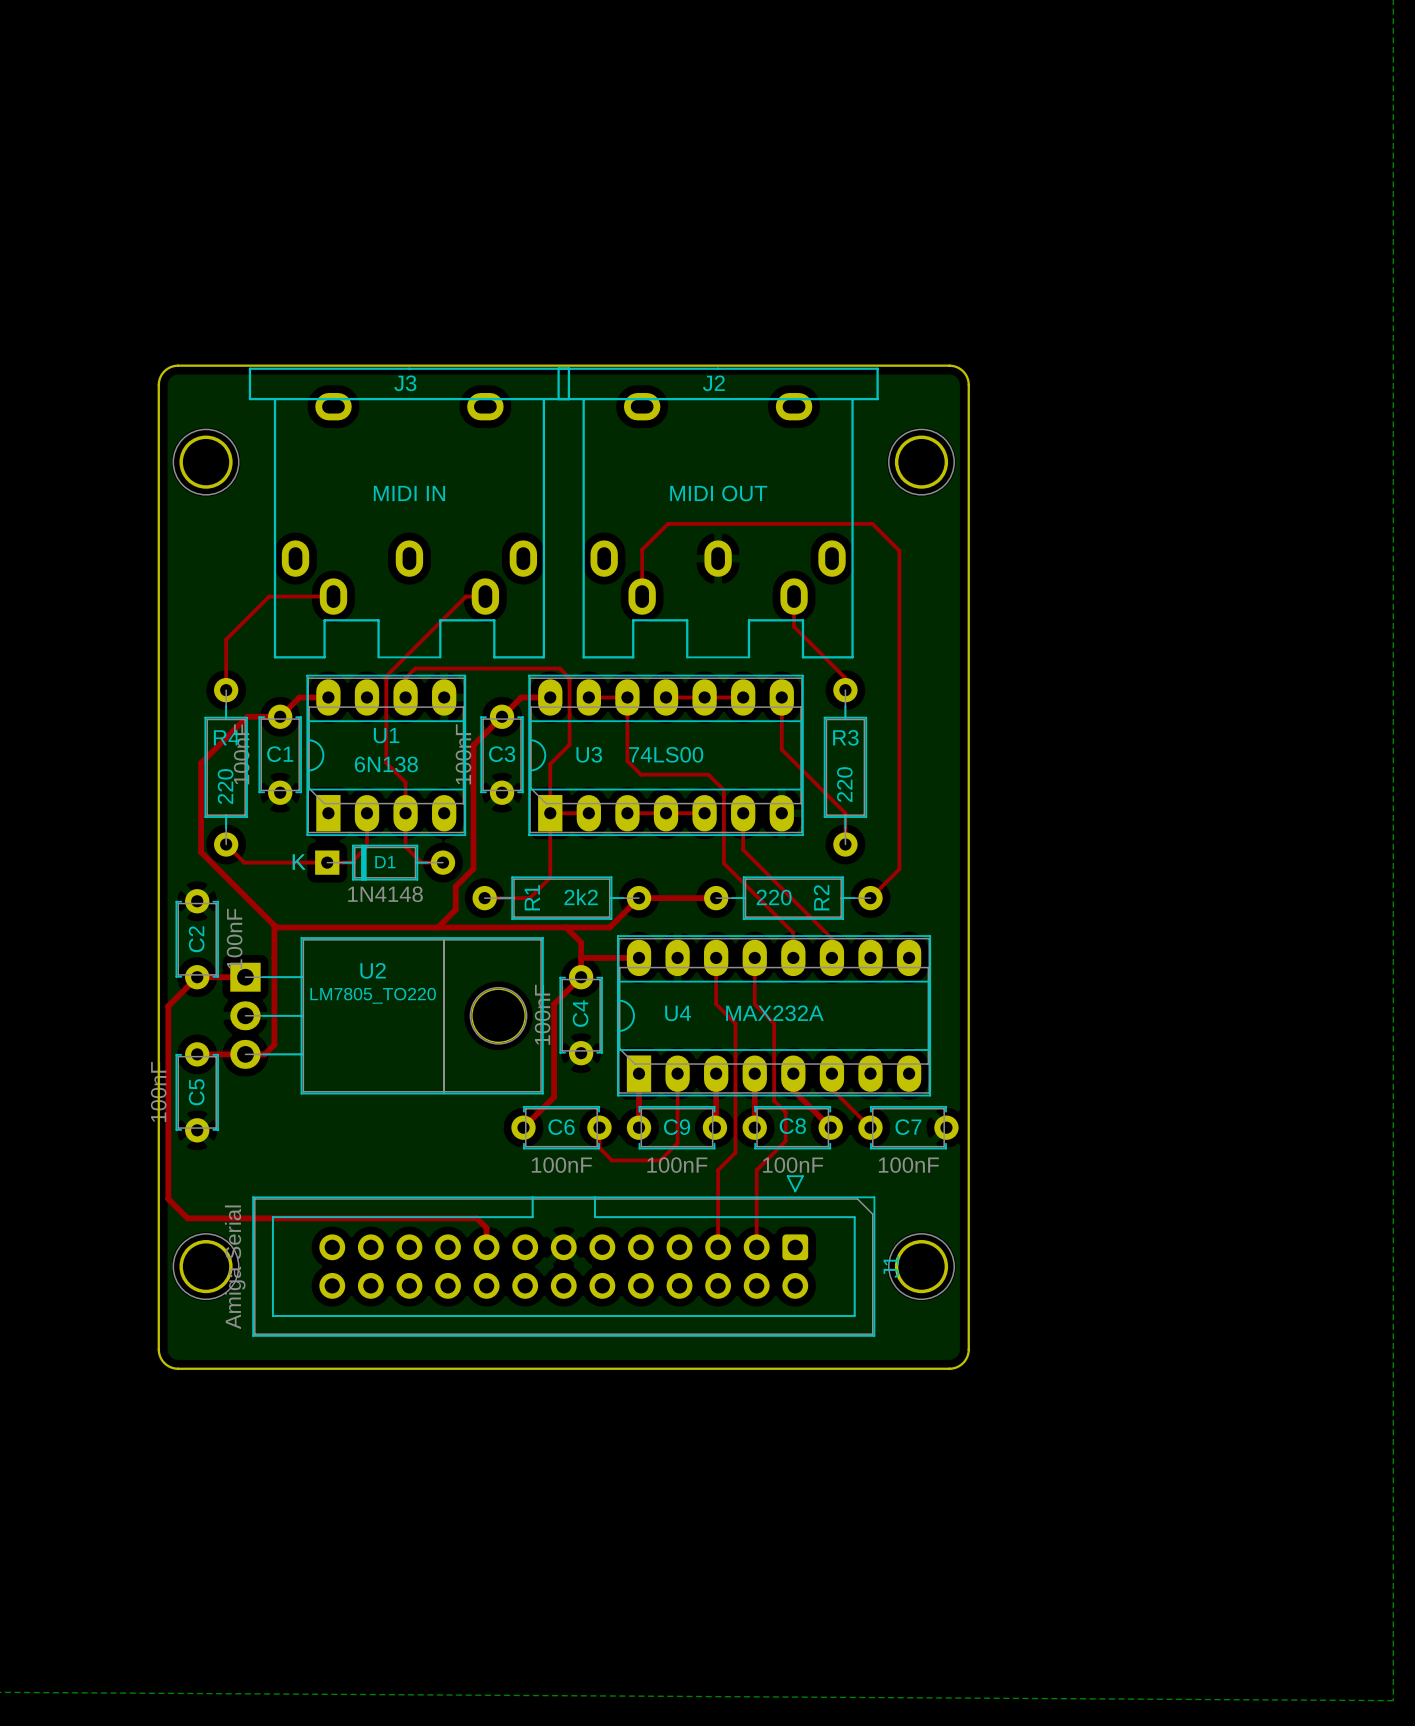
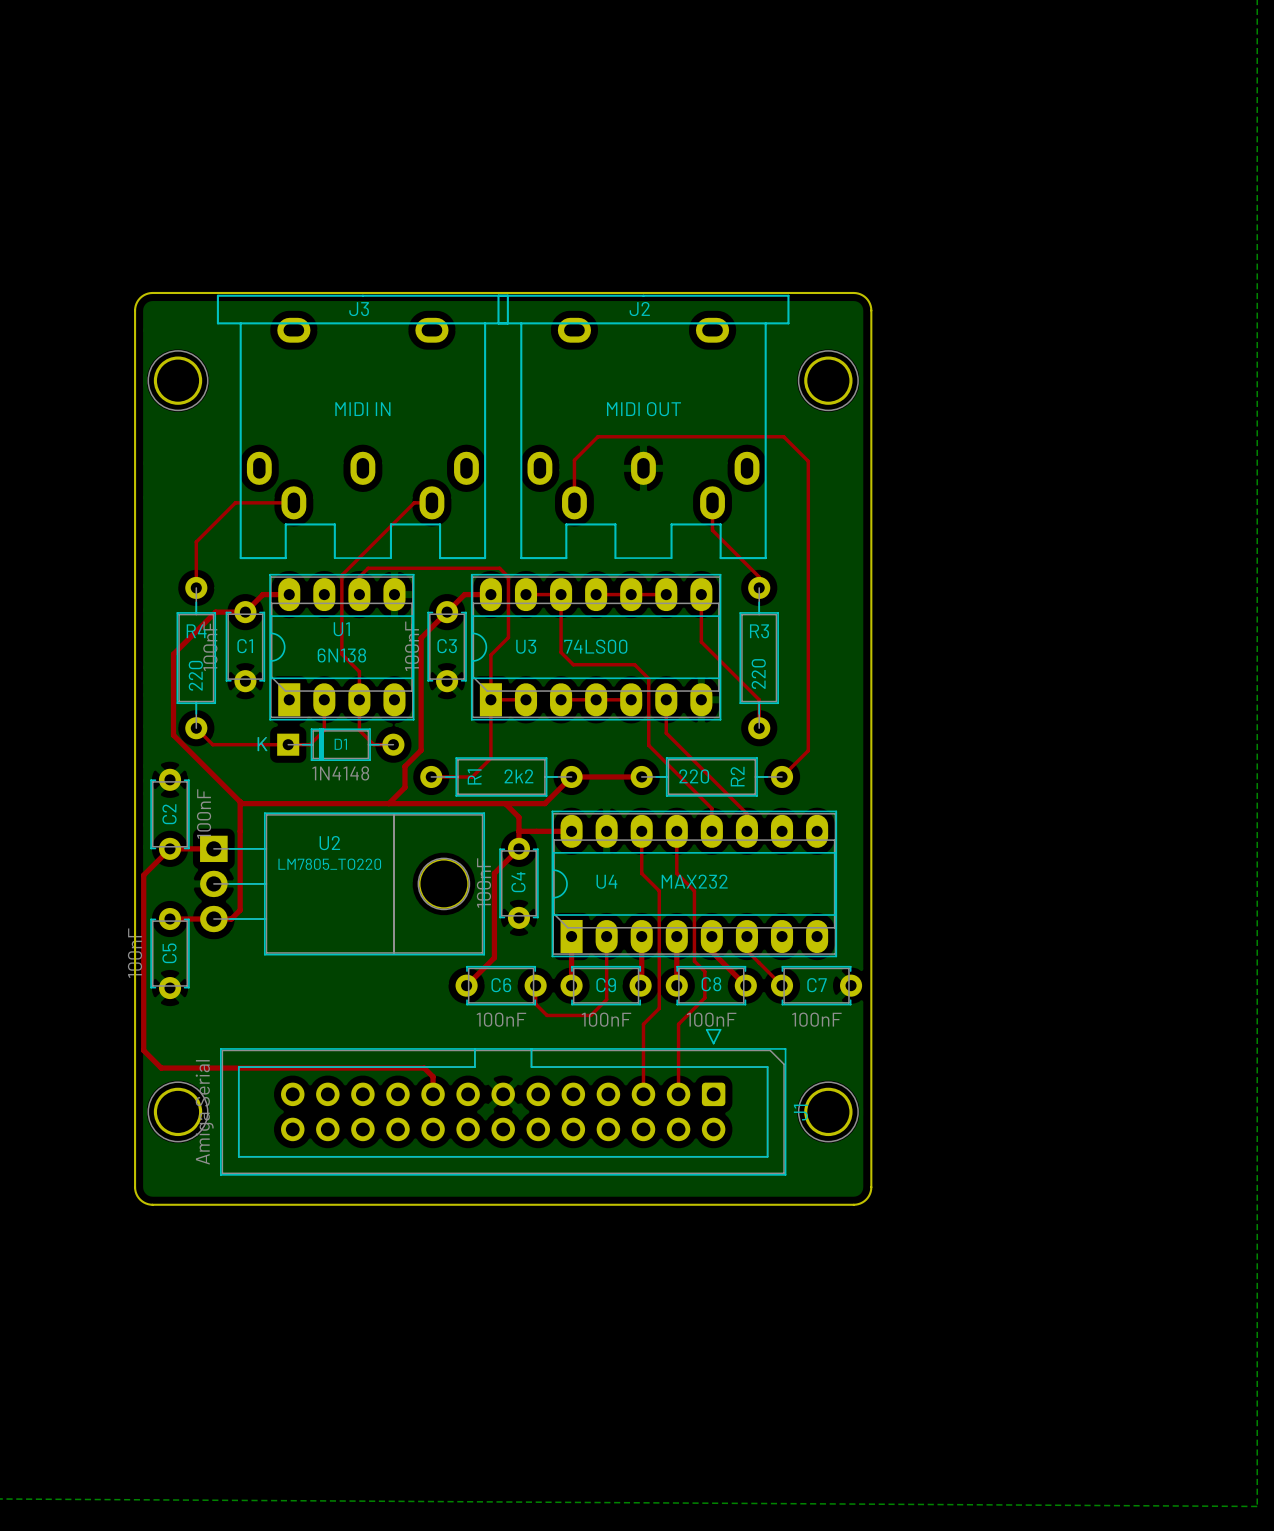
U4 value: MAX232A (774, 1013) -> MAX232 (694, 881)

